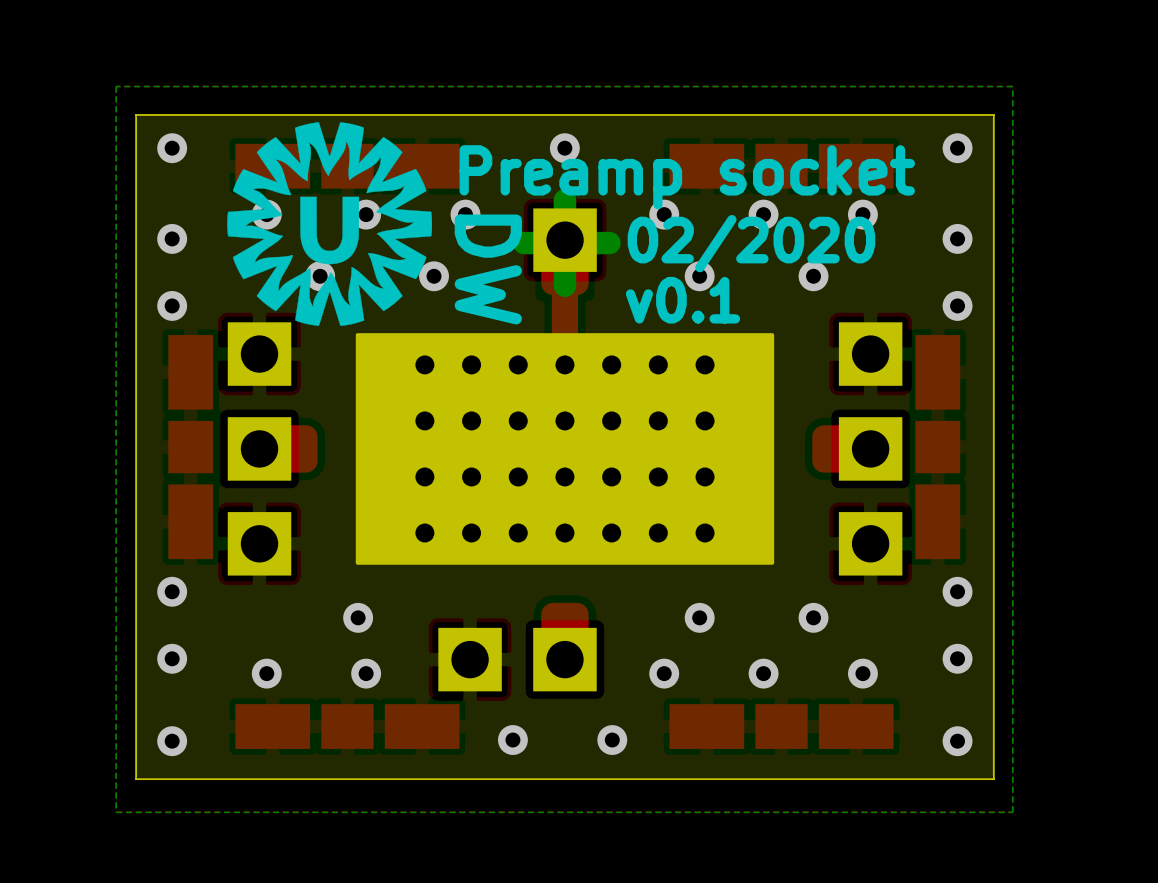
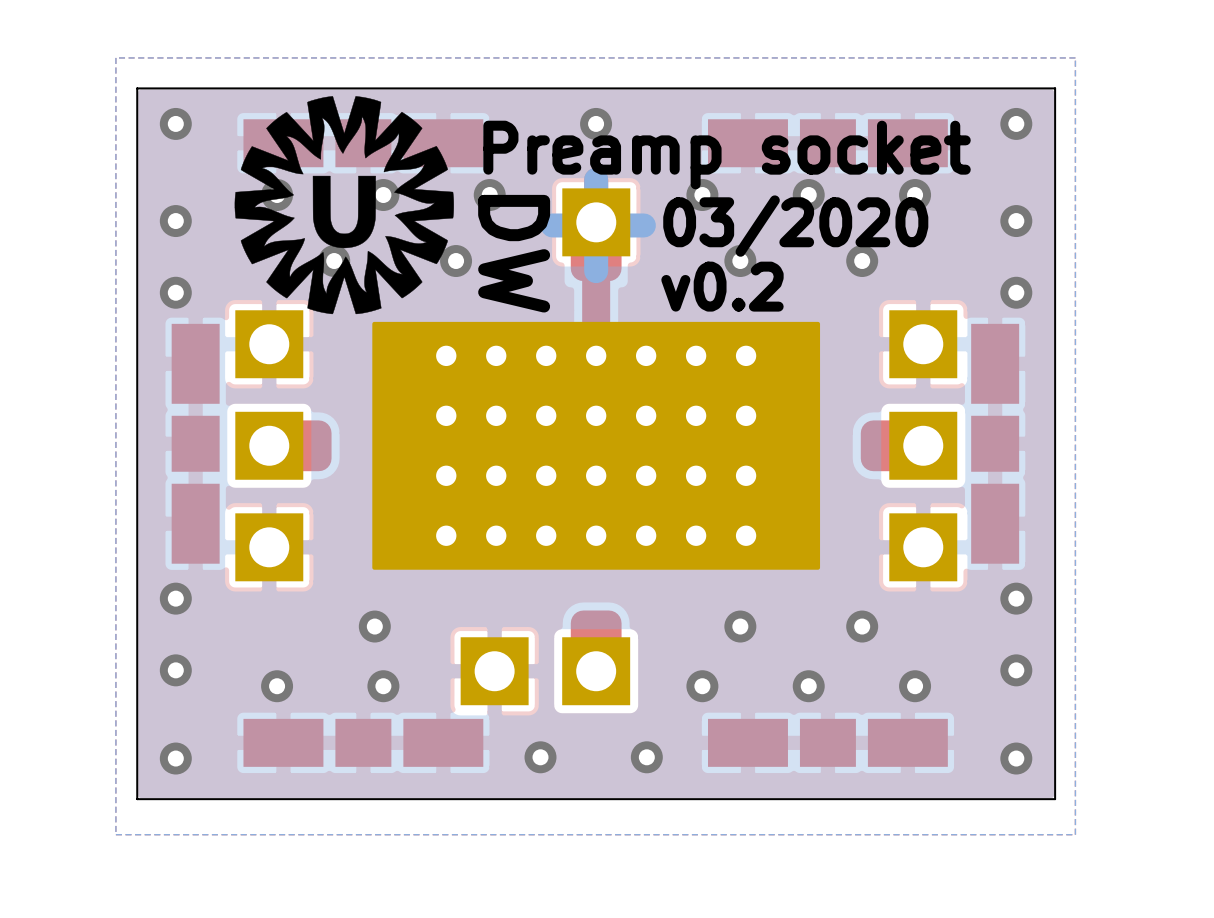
text: 02/2020 (751, 243) -> 03/2020 (795, 226)
text: v0.1 (682, 300) -> v0.2 (722, 286)

